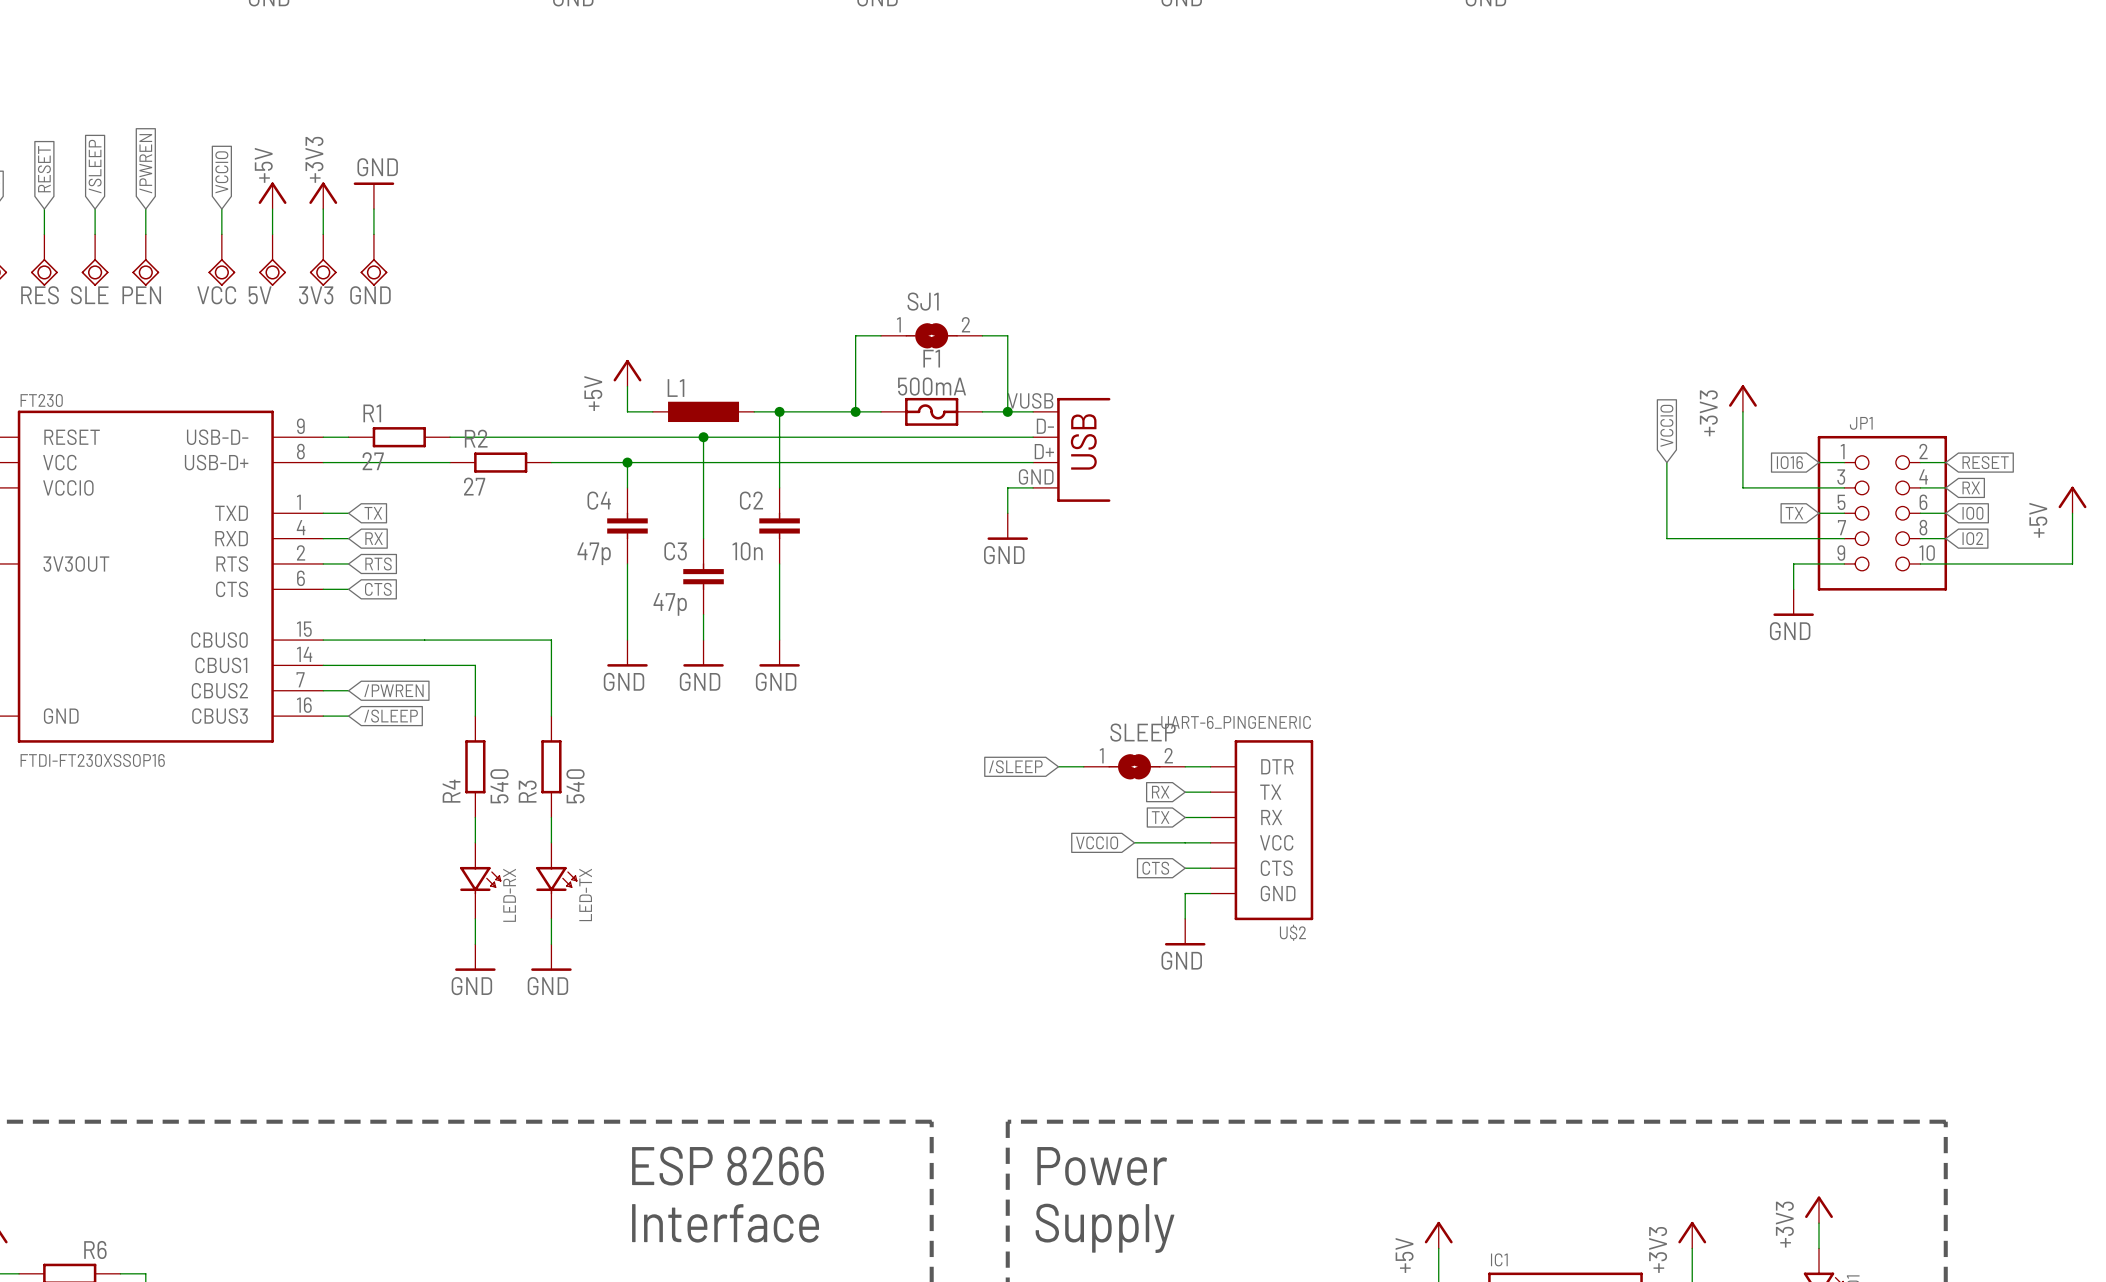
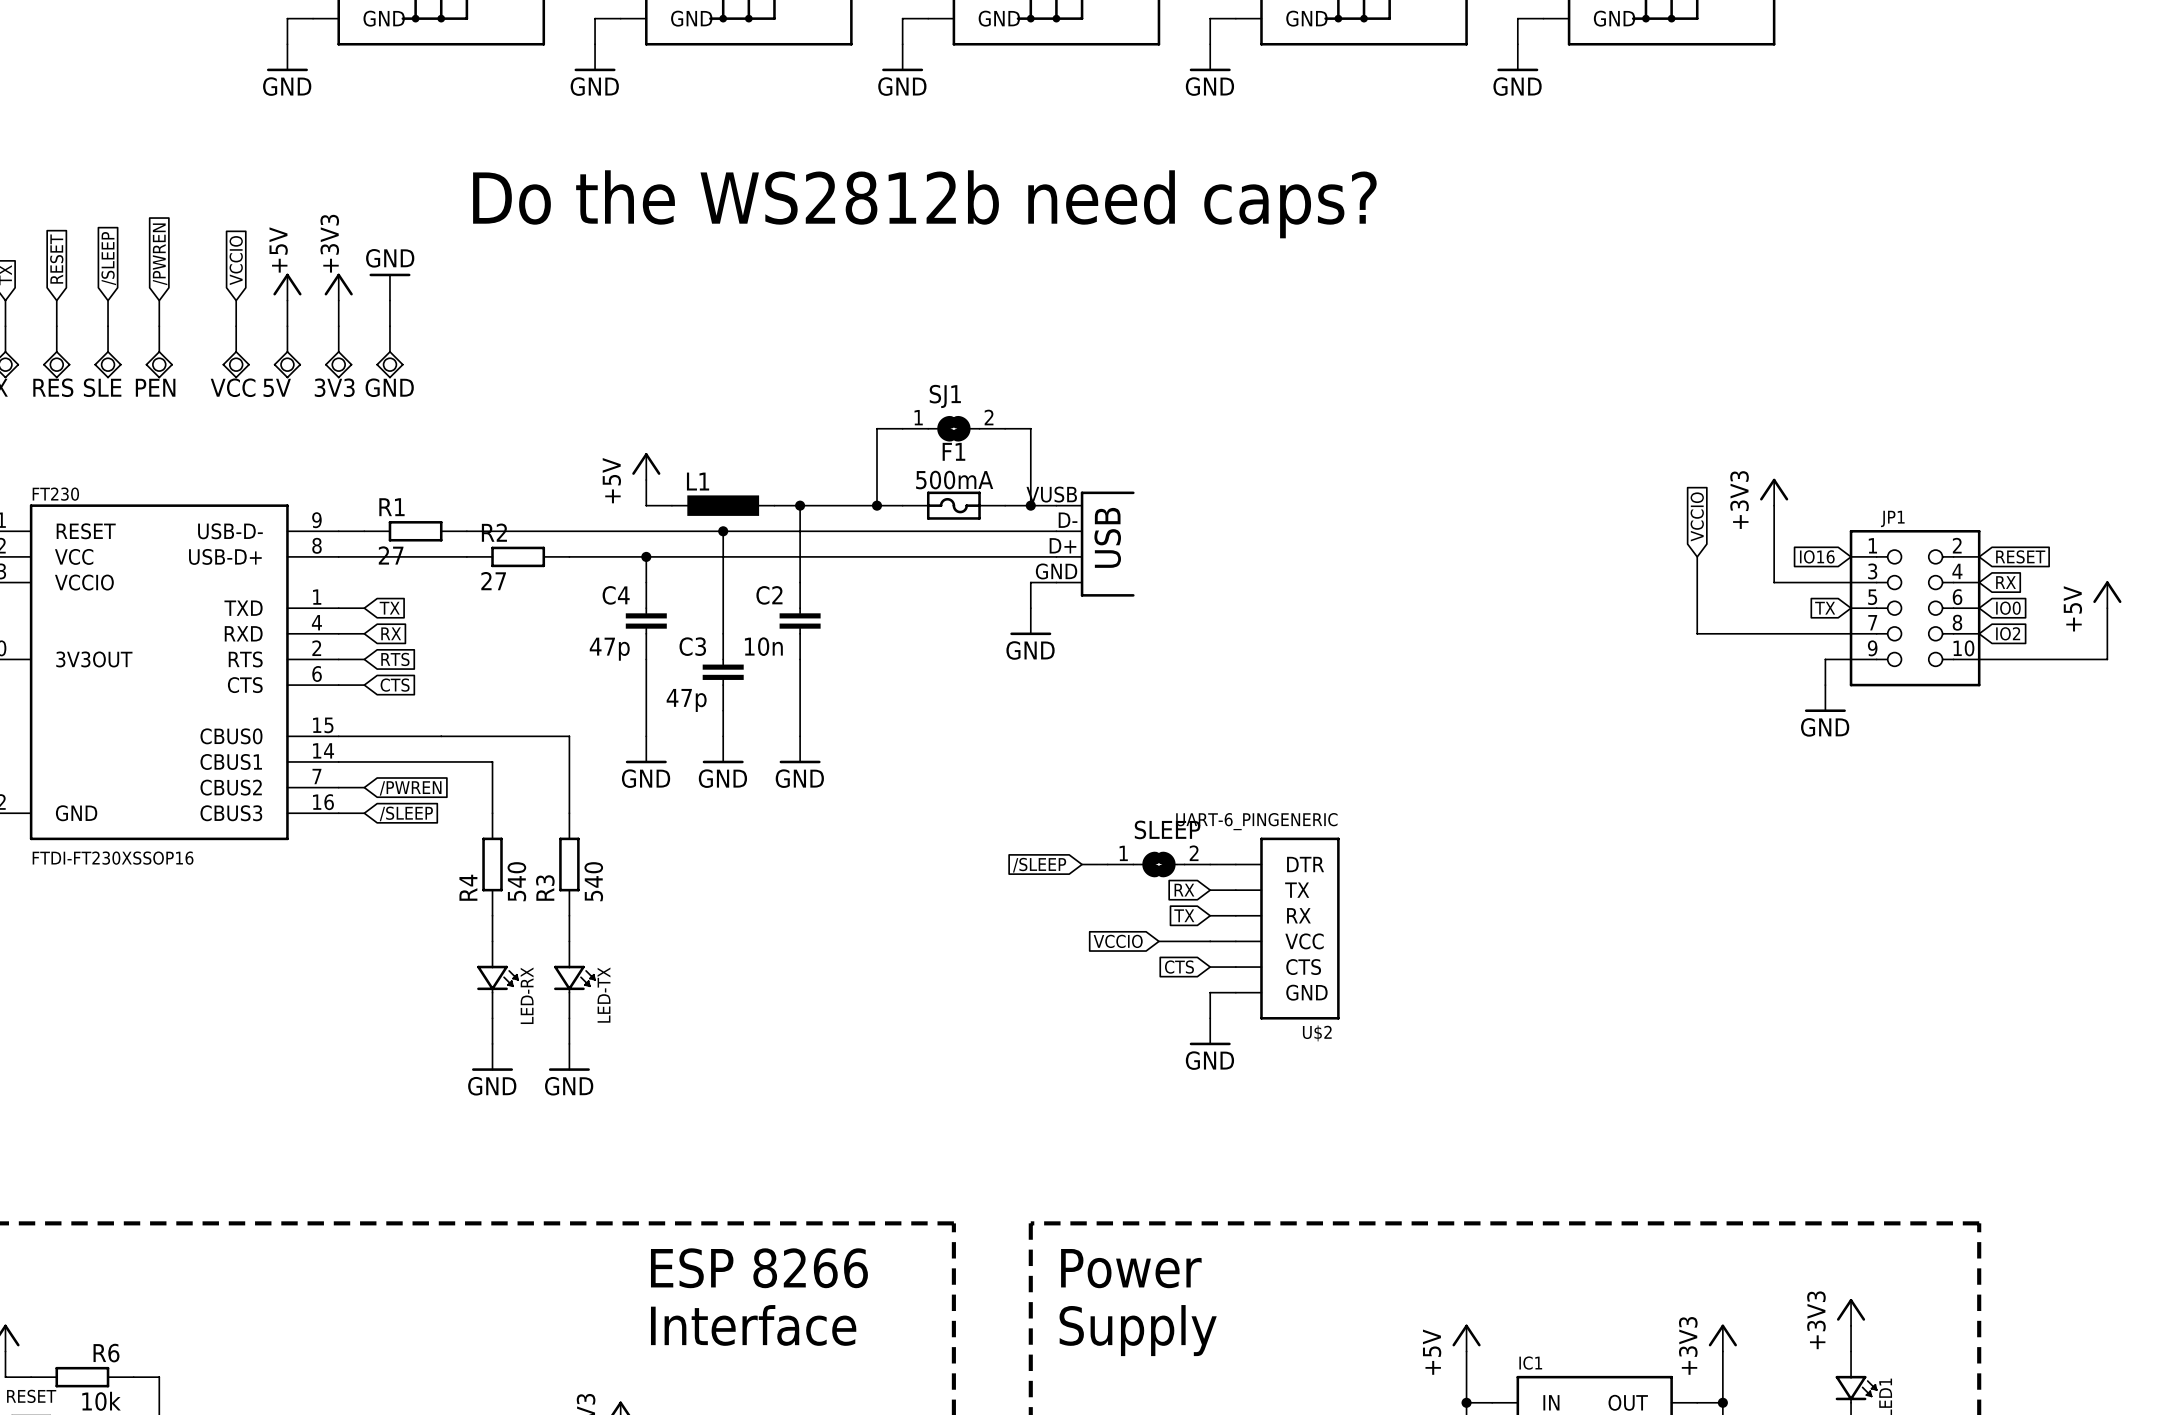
text: none -> Do the WS2812b need caps? (924, 204)

